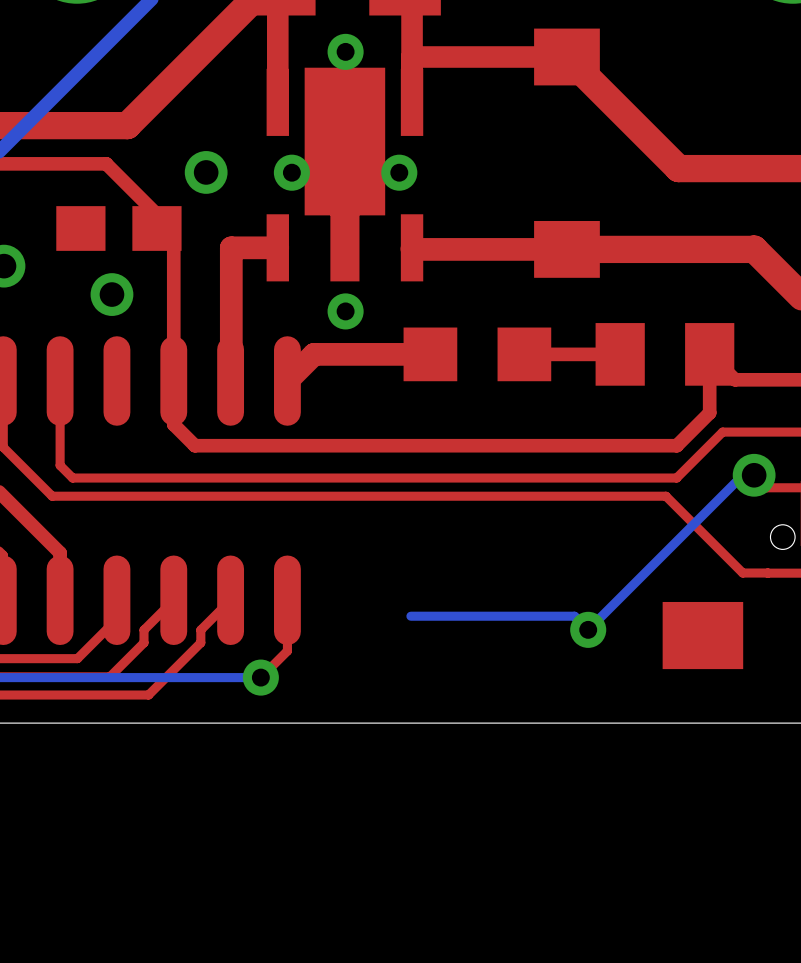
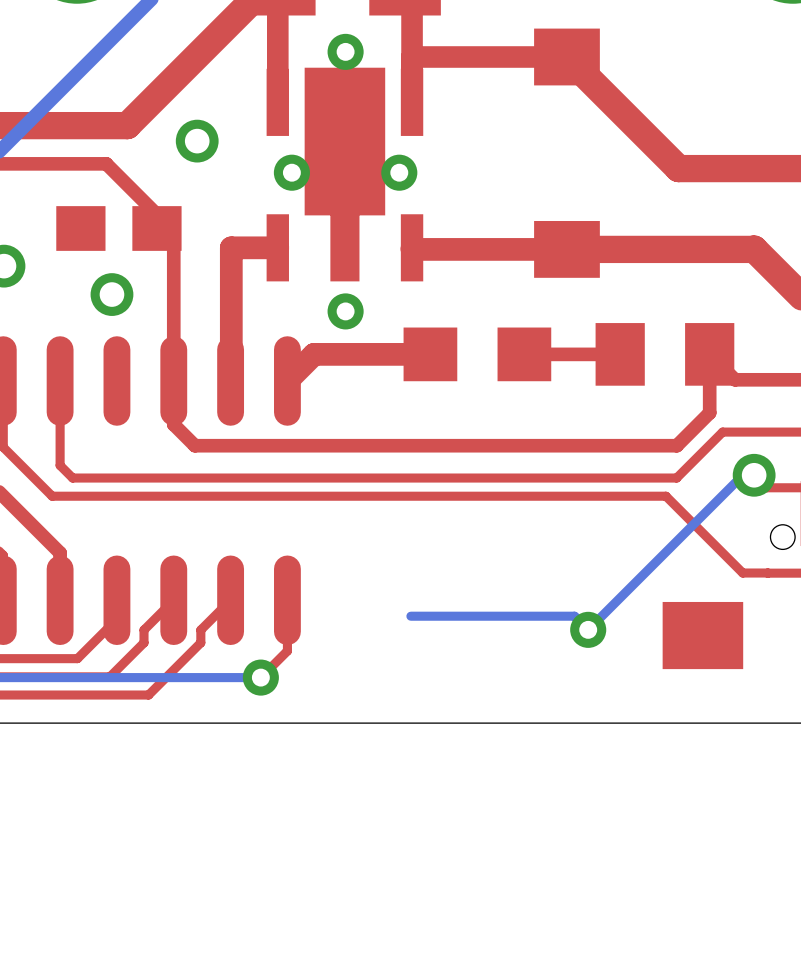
via position: (206, 172) -> (197, 141)

